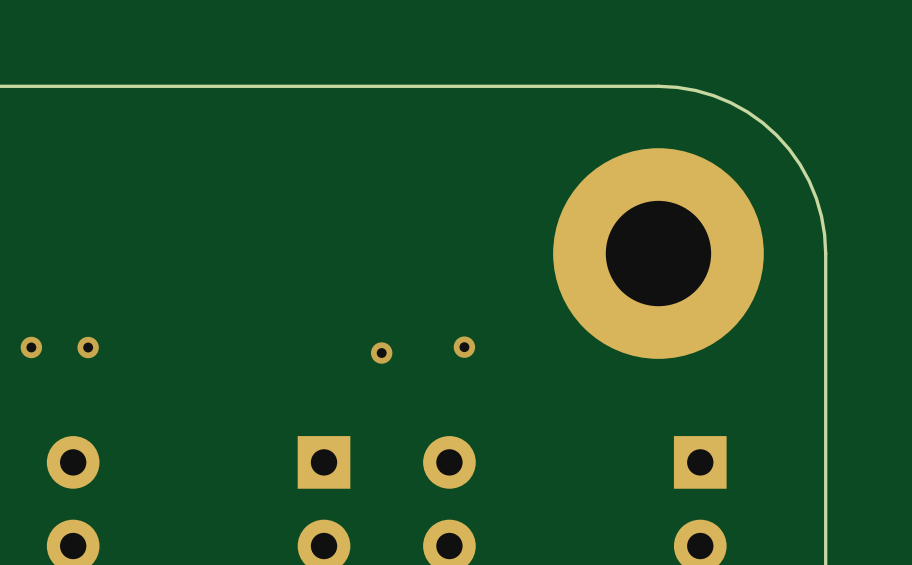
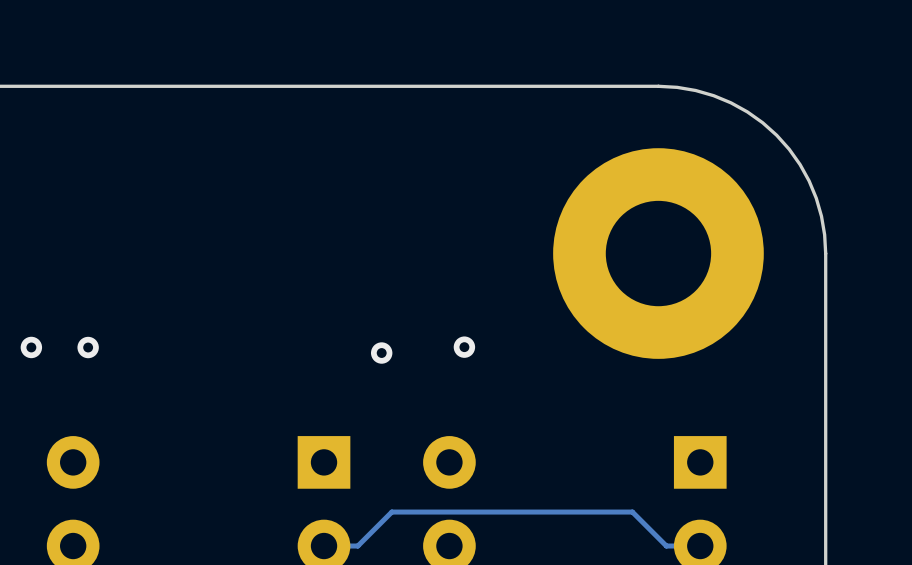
track: none -> (700, 546) (666, 546) (632, 512) (391, 512) (357, 546) (324, 546)

